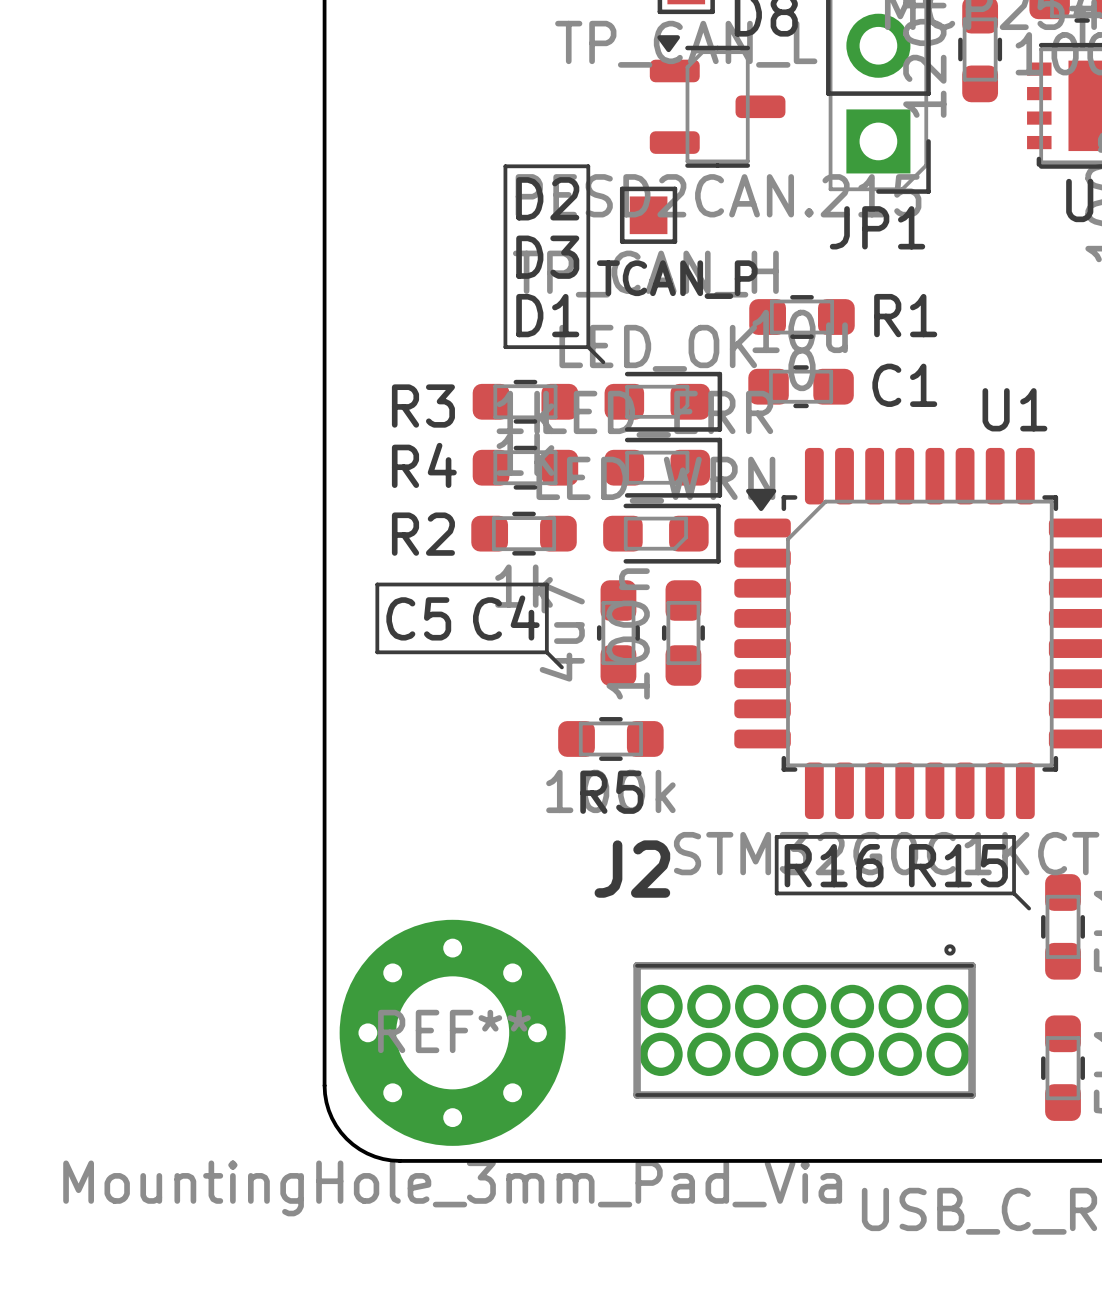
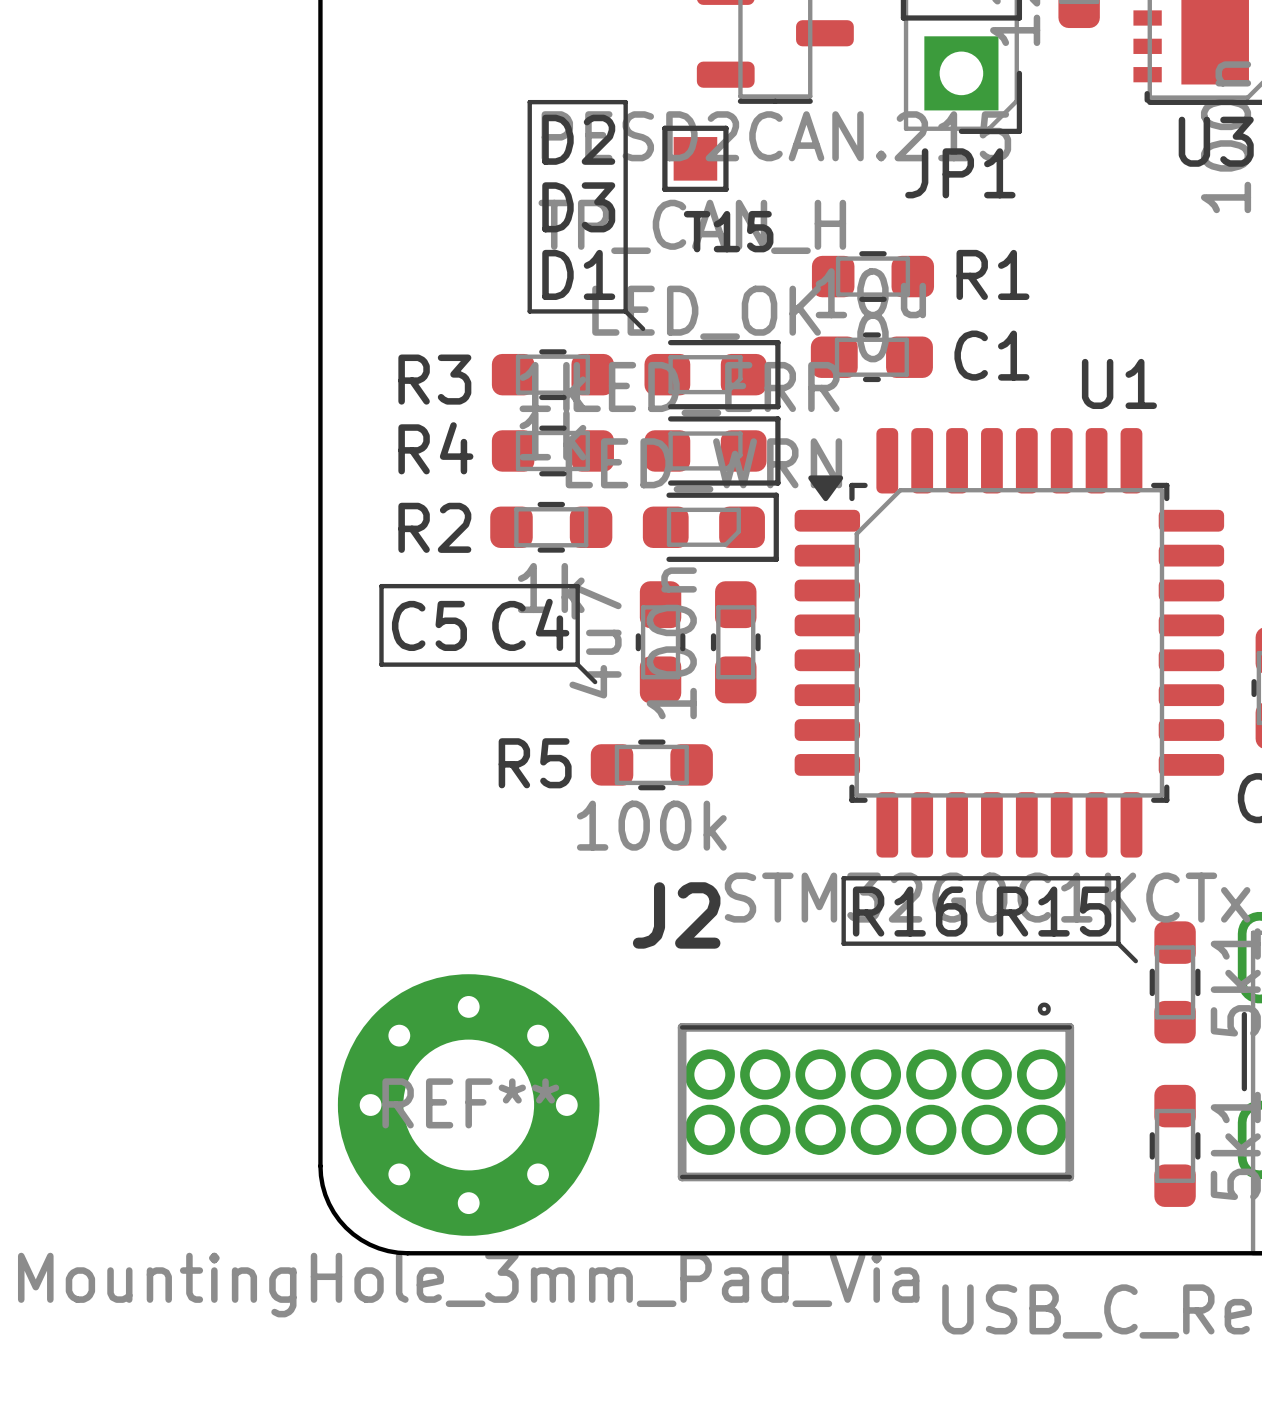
TCAN_P name: TCAN_P (677, 279) -> T15 (728, 231)
R5 name position: R5 (611, 792) -> R5 (535, 763)

